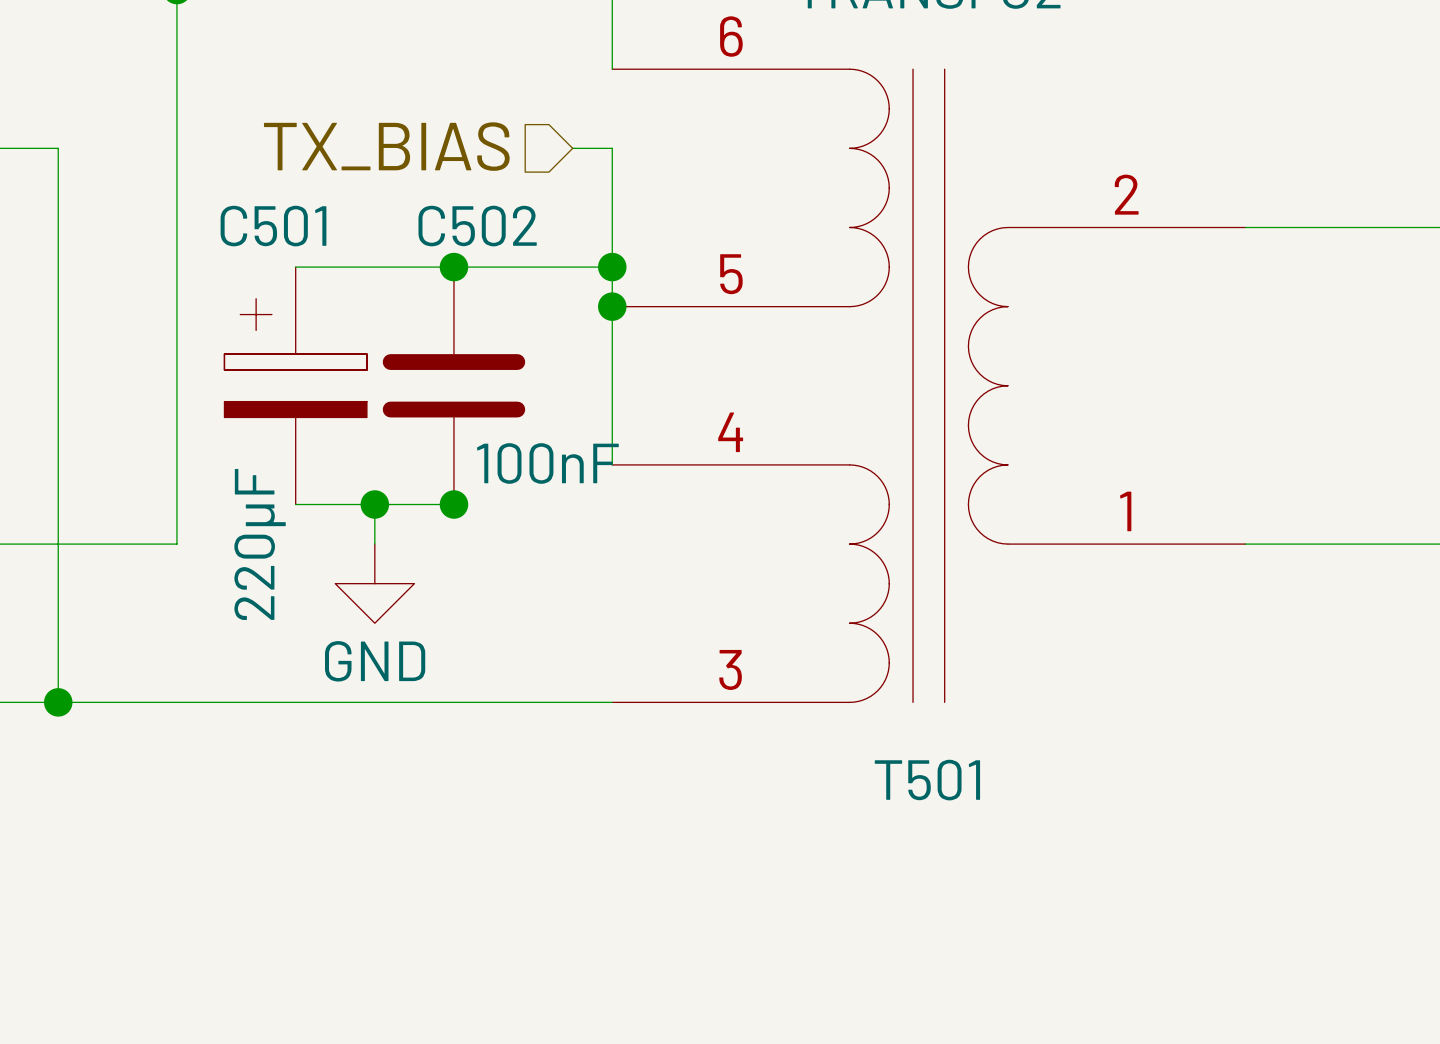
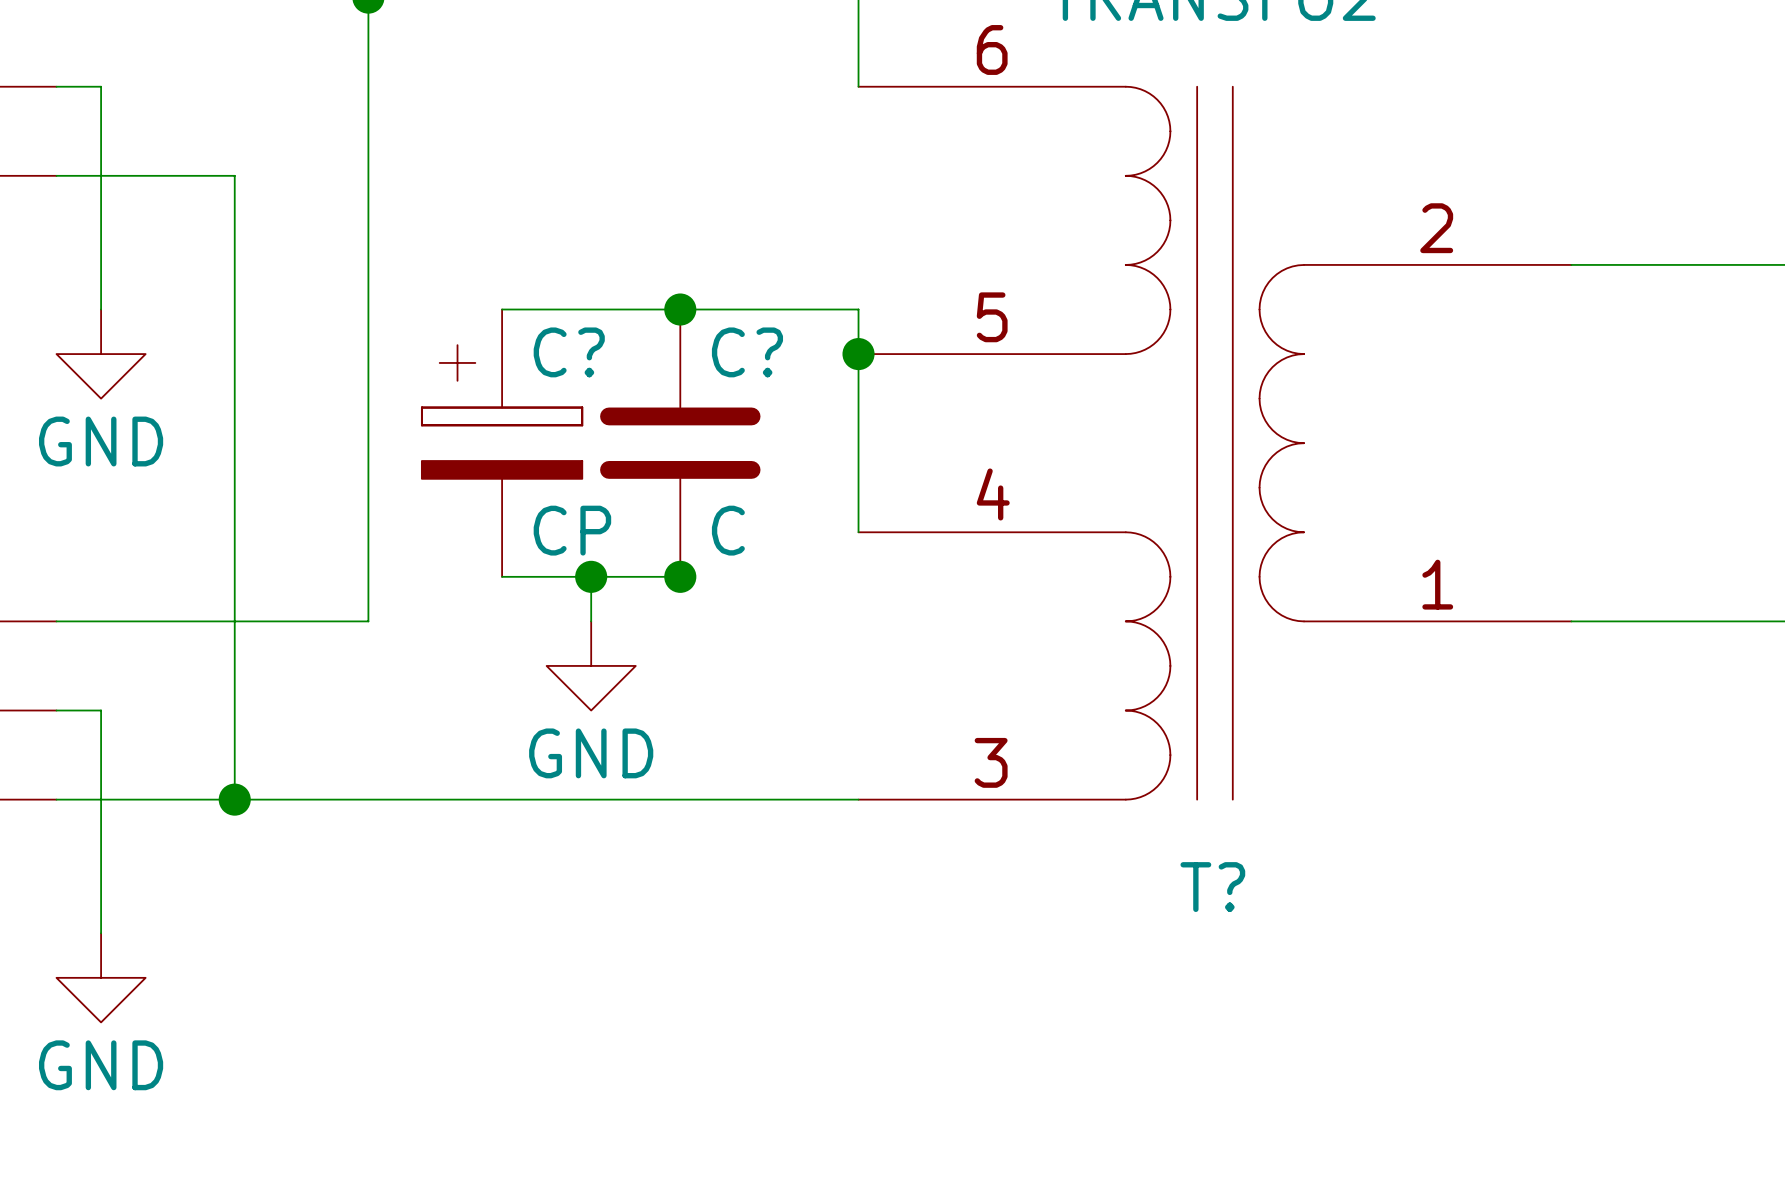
hierarchical label: TX_BIAS (386, 146) -> none
wire: (572, 148) (612, 148) (612, 267) -> none
C501 name: C501 (273, 226) -> C? (569, 352)
C502 name: C502 (477, 226) -> C? (747, 352)
junction: (612, 267) -> none
C502 value: 100nF (547, 463) -> C (728, 530)
C501 value: 220µF (260, 544) -> CP (572, 530)
T501 name: T501 (927, 780) -> T? (1212, 887)

